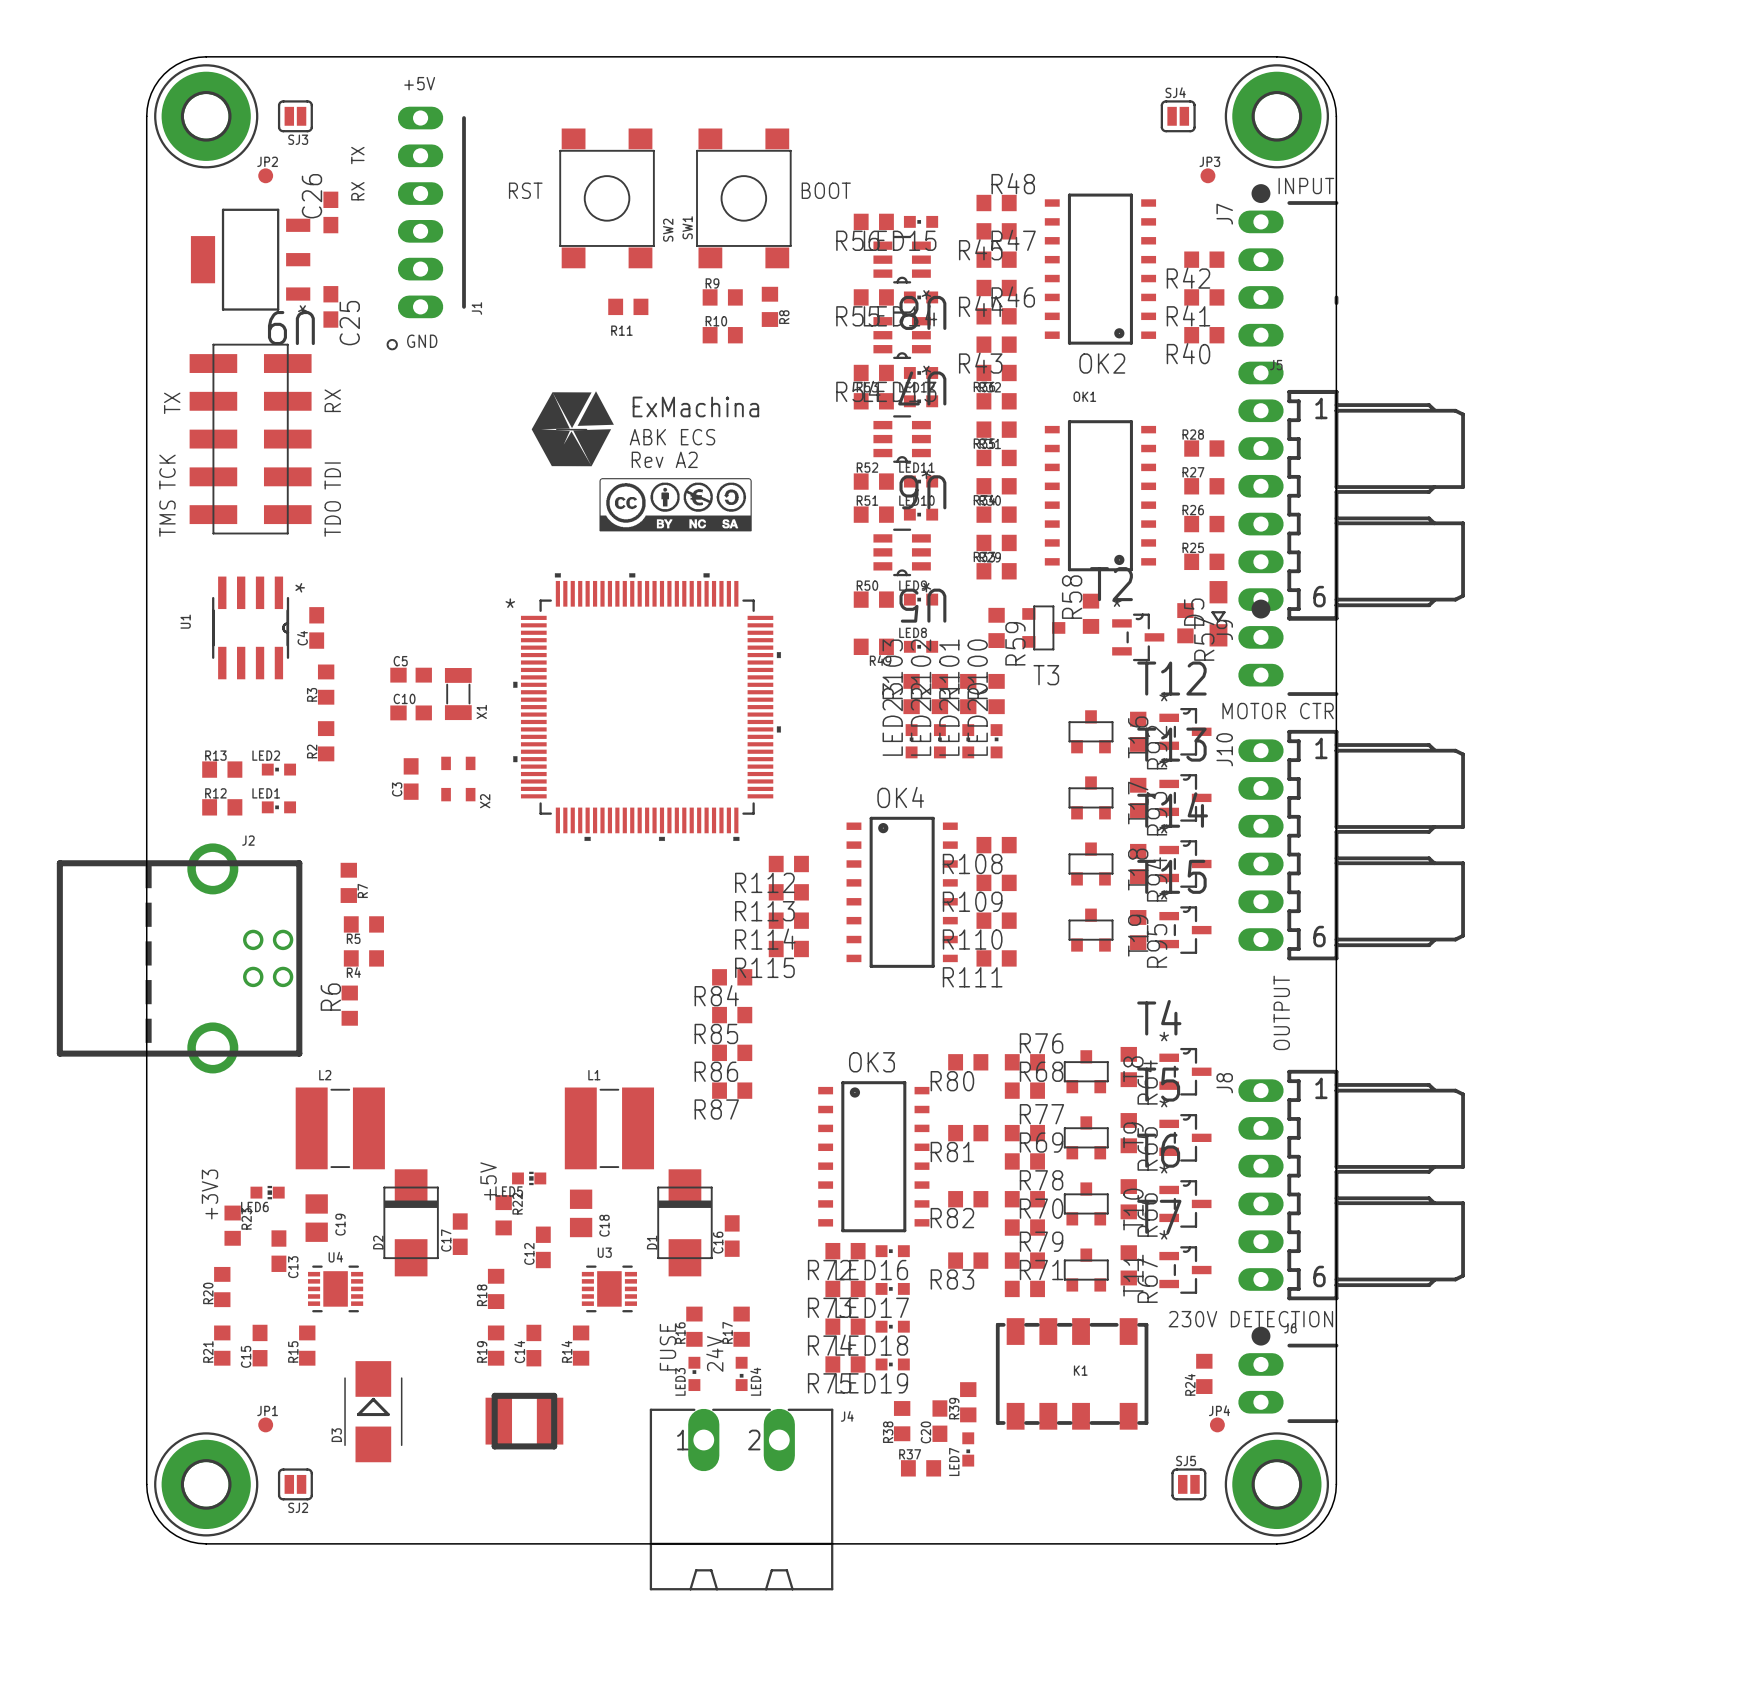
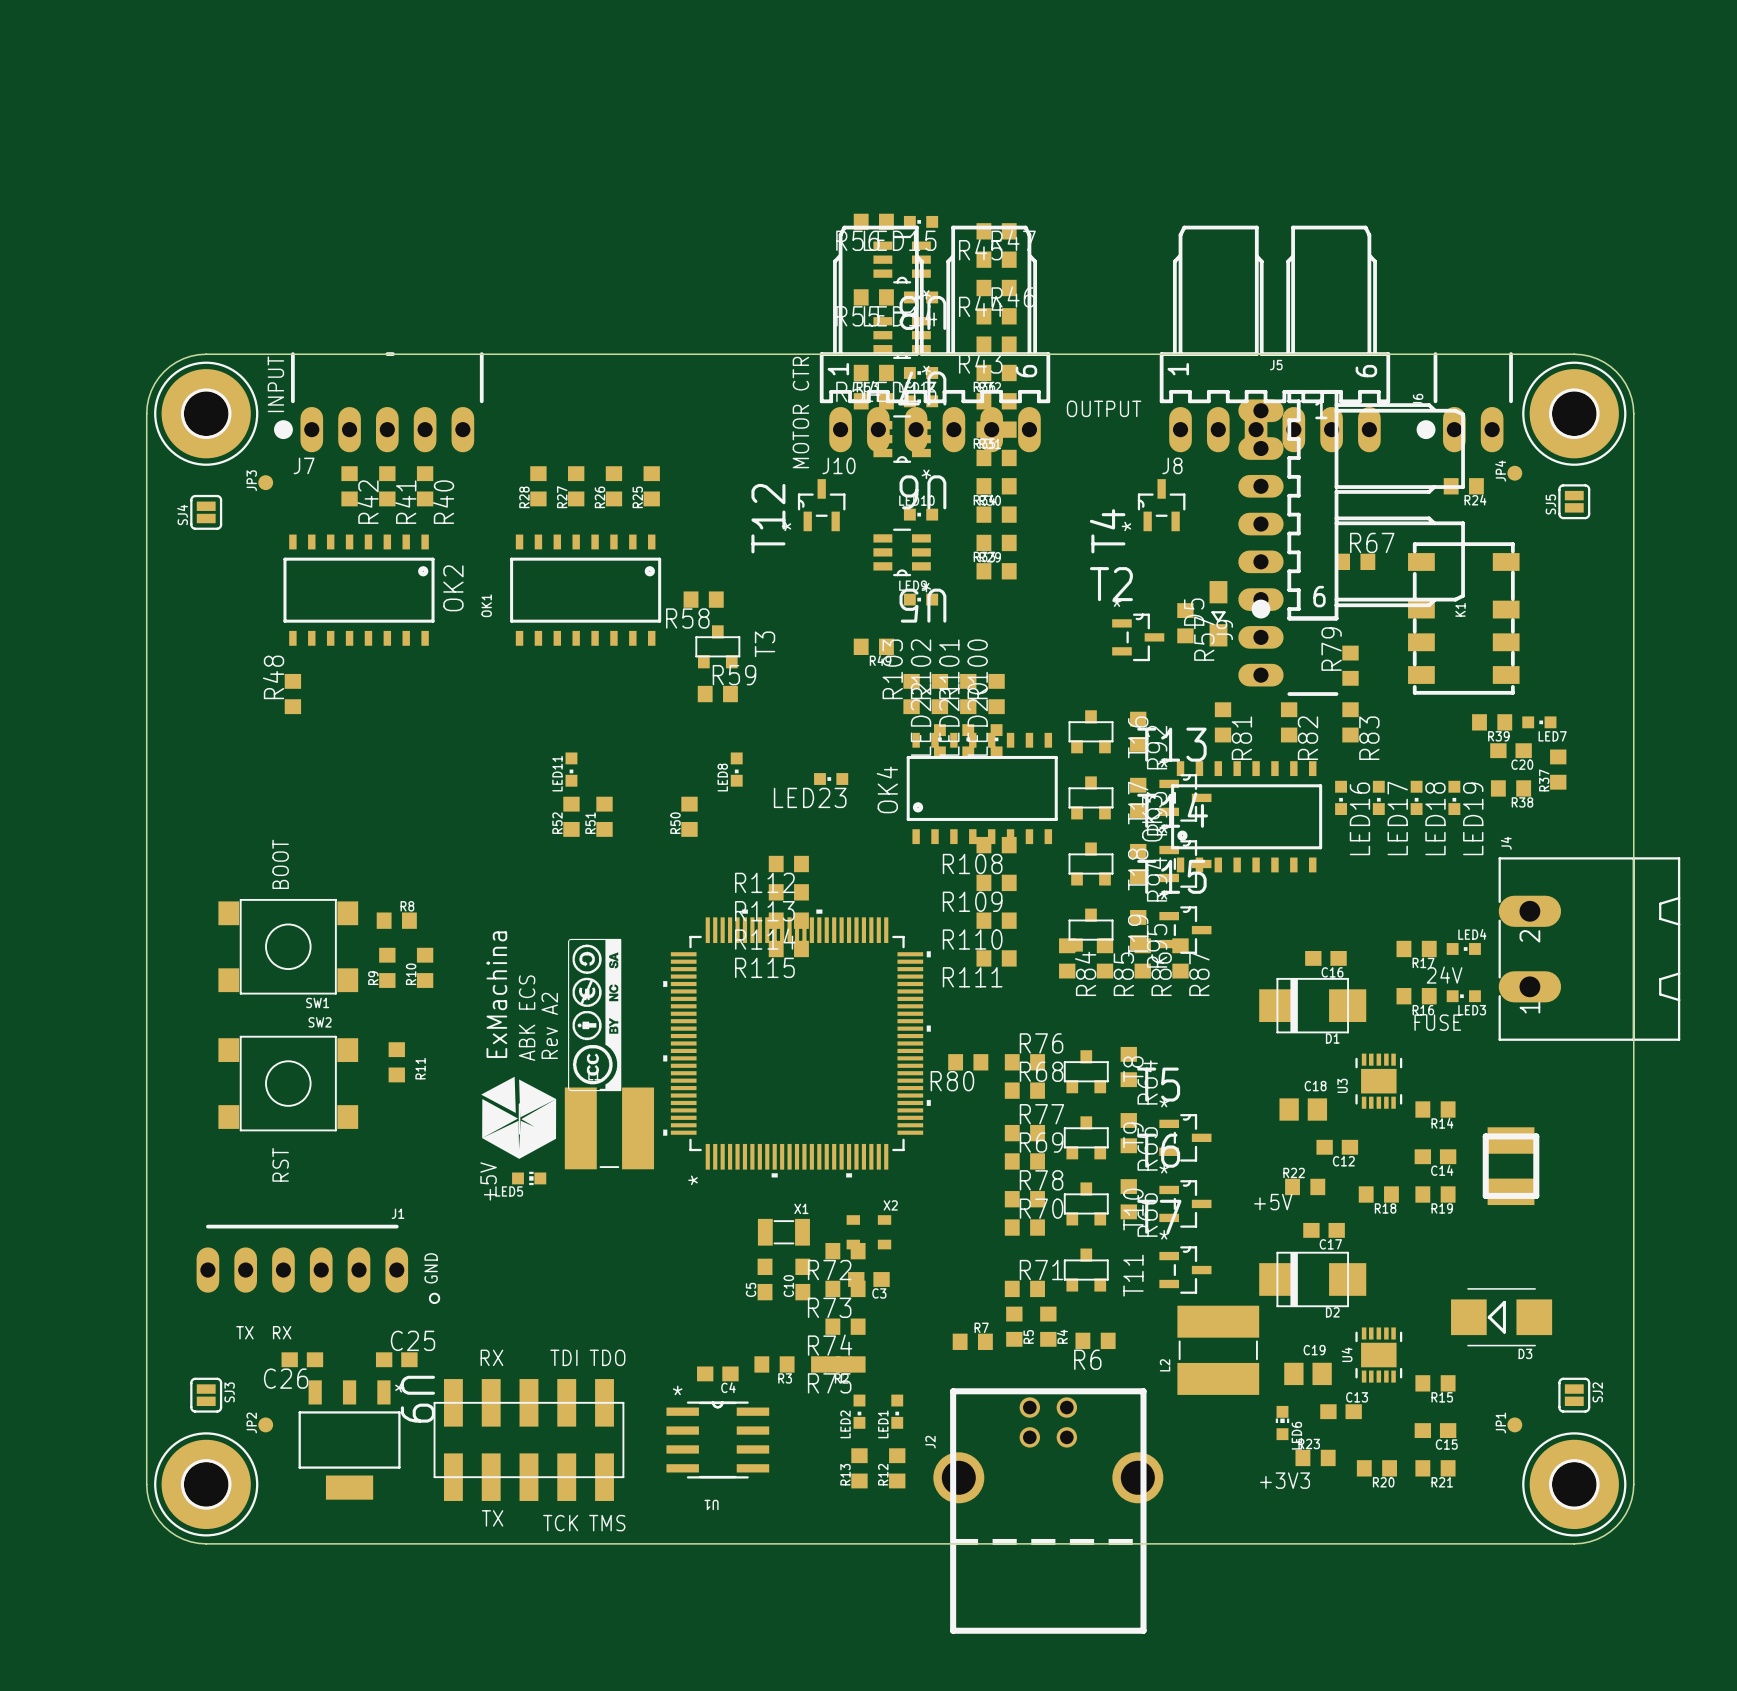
text: +5V (419, 83) -> none
part position: (206, 116) -> (206, 413)
SJ3 rotation: 0° (295, 116) -> 90° counterclockwise (206, 1395)
SJ3 position: (295, 116) -> (206, 1395)
SJ4 rotation: 0° (1178, 116) -> 90° counterclockwise (206, 512)
SJ4 position: (1178, 116) -> (206, 512)
part: (1276, 116) -> none
text: TX (357, 155) -> none
JP3 name rotation: 0° (1209, 161) -> 90° counterclockwise (251, 480)
JP2: (265, 175) -> none
JP3 position: (1207, 175) -> (265, 482)
R48 name position: R48 (1013, 183) -> R48 (273, 677)
text: INPUT (1306, 186) -> none
text: RST (525, 190) -> none
text: BOOT (826, 190) -> none
text: RX (357, 191) -> none
C26 name position: C26 (311, 196) -> C26 (286, 1378)
SW2 rotation: 0° (607, 198) -> 90° clockwise (288, 1083)
SW2 position: (607, 198) -> (288, 1083)
SW1 rotation: 0° (743, 198) -> 90° clockwise (288, 946)
SW1 position: (743, 198) -> (288, 946)
R48 rotation: 0° (996, 203) -> 90° clockwise (292, 694)
R48 position: (996, 203) -> (292, 694)
C26 rotation: 0° (330, 212) -> 90° clockwise (302, 1359)
C26 position: (330, 212) -> (302, 1359)
SW1 name position: SW1 (687, 227) -> SW1 (317, 1002)
J1 rotation: 0° (426, 228) -> 90° counterclockwise (318, 1264)
J1 position: (426, 228) -> (318, 1264)
SW2 name position: SW2 (668, 230) -> SW2 (320, 1022)
U9 rotation: 0° (250, 259) -> 90° counterclockwise (349, 1440)
U9 position: (250, 259) -> (349, 1440)
R42 rotation: 0° (1204, 259) -> 90° clockwise (349, 486)
R42 position: (1204, 259) -> (349, 486)
OK2 rotation: 0° (1100, 269) -> 90° counterclockwise (359, 590)
OK2 position: (1100, 269) -> (359, 590)
R42 name position: R42 (1188, 278) -> R42 (367, 502)
J7 rotation: 0° (1288, 288) -> 90° counterclockwise (378, 402)
J7 position: (1288, 288) -> (378, 402)
R9 rotation: 0° (722, 297) -> 90° clockwise (387, 967)
R9 position: (722, 297) -> (387, 967)
R41 rotation: 0° (1204, 297) -> 90° clockwise (387, 486)
R41 position: (1204, 297) -> (387, 486)
C25 rotation: 0° (330, 306) -> 90° clockwise (396, 1359)
C25 position: (330, 306) -> (396, 1359)
R11 rotation: 0° (628, 306) -> 90° clockwise (396, 1062)
R11 position: (628, 306) -> (396, 1062)
R8 rotation: 0° (769, 306) -> 90° clockwise (396, 920)
R8 position: (769, 306) -> (396, 920)
R41 name position: R41 (1188, 315) -> R41 (405, 502)
C25 name position: C25 (349, 323) -> C25 (413, 1340)
R11 name position: R11 (621, 330) -> R11 (420, 1068)
R10 rotation: 0° (722, 335) -> 90° clockwise (425, 967)
R10 position: (722, 335) -> (425, 967)
R40 rotation: 0° (1204, 335) -> 90° clockwise (425, 486)
R40 position: (1204, 335) -> (425, 486)
text: GND (422, 341) -> none
R40 name position: R40 (1188, 353) -> R40 (443, 502)
text: none -> INPUT (275, 384)
drawing: [531, 391, 752, 532] -> none
text: RX (332, 400) -> none
text: TX (172, 403) -> none
text: none -> OUTPUT (1104, 408)
text: none -> MOTOR CTR (800, 412)
board edge: (146, 413) (147, 108) (154, 86) (164, 74) (176, 64) (190, 58) (206, 56) (1276, 56) (1299, 61) (1318, 74) (1331, 93) (1336, 116) (1336, 1484) (1331, 1507) (1318, 1526) (1299, 1539) (1276, 1543) -> (146, 413) (151, 390) (164, 371) (183, 358) (206, 354) (1574, 354) (1597, 358) (1616, 371) (1629, 390) (1633, 413) (1633, 1484) (1631, 1499) (1625, 1514) (1616, 1526) (1604, 1535) (1582, 1543) (1276, 1543)
part: none -> (1574, 413)
text: ABK ECS (672, 437) -> none
part: (250, 439) -> none
R28 rotation: 0° (1204, 448) -> 90° clockwise (538, 486)
R28 position: (1204, 448) -> (538, 486)
text: Rev A2 (664, 459) -> none
text: TCK (167, 472) -> none
text: TDI (332, 475) -> none
R52 rotation: 0° (873, 481) -> 90° clockwise (571, 816)
R52 position: (873, 481) -> (571, 816)
LED11 rotation: 0° (921, 481) -> 90° counterclockwise (571, 769)
LED11 position: (921, 481) -> (571, 769)
R27 rotation: 0° (1204, 486) -> 90° clockwise (576, 486)
R27 position: (1204, 486) -> (576, 486)
OK1 rotation: 0° (1100, 495) -> 90° counterclockwise (585, 590)
OK1 position: (1100, 495) -> (585, 590)
R51 rotation: 0° (873, 514) -> 90° clockwise (604, 816)
R51 position: (873, 514) -> (604, 816)
text: TMS (167, 518) -> none
text: TDO (332, 518) -> none
R26 rotation: 0° (1204, 524) -> 90° clockwise (613, 486)
R26 position: (1204, 524) -> (613, 486)
R25 rotation: 0° (1204, 561) -> 90° clockwise (651, 486)
R25 position: (1204, 561) -> (651, 486)
R58 name position: R58 (1072, 597) -> R58 (687, 618)
R50 rotation: 0° (873, 599) -> 90° clockwise (689, 816)
R50 position: (873, 599) -> (689, 816)
R58 rotation: 0° (1091, 613) -> 90° clockwise (703, 599)
R58 position: (1091, 613) -> (703, 599)
U1 rotation: 0° (250, 627) -> 90° counterclockwise (717, 1440)
U1 position: (250, 627) -> (717, 1440)
C4 rotation: 0° (316, 627) -> 90° clockwise (717, 1373)
C4 position: (316, 627) -> (717, 1373)
R59 rotation: 0° (996, 627) -> 90° clockwise (717, 694)
R59 position: (996, 627) -> (717, 694)
T3 rotation: 0° (1043, 627) -> 90° counterclockwise (717, 646)
T3 position: (1043, 627) -> (717, 646)
R59 name position: R59 (1015, 643) -> R59 (734, 675)
LED8 rotation: 0° (921, 646) -> 90° counterclockwise (736, 769)
LED8 position: (921, 646) -> (736, 769)
C5 rotation: 0° (411, 675) -> 90° clockwise (765, 1279)
C5 position: (411, 675) -> (765, 1279)
R3 rotation: 0° (326, 684) -> 90° clockwise (774, 1364)
R3 position: (326, 684) -> (774, 1364)
X1 rotation: 0° (458, 694) -> 90° clockwise (783, 1232)
X1 position: (458, 694) -> (783, 1232)
part rotation: 0° (647, 707) -> 90° counterclockwise (797, 1043)
part position: (647, 707) -> (797, 1043)
X1 name position: X1 (481, 711) -> X1 (801, 1208)
text: MOTOR CTR (1278, 711) -> none
C10 rotation: 0° (411, 712) -> 90° clockwise (802, 1279)
C10 position: (411, 712) -> (802, 1279)
T12 rotation: 0° (1185, 731) -> 90° counterclockwise (821, 505)
T12 position: (1185, 731) -> (821, 505)
R2 rotation: 0° (326, 741) -> 90° clockwise (831, 1364)
R2 position: (326, 741) -> (831, 1364)
LED23 rotation: 0° (911, 741) -> 90° counterclockwise (831, 779)
LED23 position: (911, 741) -> (831, 779)
R13 rotation: 0° (222, 769) -> 90° clockwise (859, 1468)
R13 position: (222, 769) -> (859, 1468)
LED2 rotation: 0° (278, 769) -> 90° counterclockwise (859, 1411)
LED2 position: (278, 769) -> (859, 1411)
C3 rotation: 0° (411, 779) -> 90° clockwise (868, 1279)
C3 position: (411, 779) -> (868, 1279)
X2 rotation: 0° (458, 779) -> 90° clockwise (868, 1232)
X2 position: (458, 779) -> (868, 1232)
X2 name position: X2 (485, 801) -> X2 (890, 1205)
R12 rotation: 0° (222, 807) -> 90° clockwise (897, 1468)
R12 position: (222, 807) -> (897, 1468)
LED1 rotation: 0° (278, 807) -> 90° counterclockwise (897, 1411)
LED1 position: (278, 807) -> (897, 1411)
J10 rotation: 0° (1351, 845) -> 90° counterclockwise (935, 338)
J10 position: (1351, 845) -> (935, 338)
text: none -> BOOT (280, 864)
R7 rotation: 0° (348, 882) -> 90° clockwise (972, 1341)
R7 position: (348, 882) -> (972, 1341)
OK4 rotation: 0° (902, 892) -> 90° counterclockwise (982, 788)
OK4 position: (902, 892) -> (982, 788)
R5 rotation: 0° (363, 924) -> 90° clockwise (1014, 1326)
R5 position: (363, 924) -> (1014, 1326)
drawing: none -> [481, 938, 622, 1159]
J2 rotation: 0° (179, 958) -> 90° counterclockwise (1048, 1511)
J2 position: (179, 958) -> (1048, 1511)
R4 rotation: 0° (363, 958) -> 90° clockwise (1048, 1326)
R4 position: (363, 958) -> (1048, 1326)
text: none -> 24V (1444, 975)
R84 rotation: 0° (732, 977) -> 90° clockwise (1067, 958)
R84 position: (732, 977) -> (1067, 958)
R84 name position: R84 (716, 995) -> R84 (1085, 973)
R6 name position: R6 (330, 997) -> R6 (1087, 1359)
R6 rotation: 0° (349, 1005) -> 90° clockwise (1095, 1340)
R6 position: (349, 1005) -> (1095, 1340)
text: OUTPUT (1281, 1012) -> none
R85 rotation: 0° (732, 1015) -> 90° clockwise (1104, 958)
R85 position: (732, 1015) -> (1104, 958)
text: none -> ABK ECS (527, 1018)
text: none -> FUSE (1437, 1022)
text: none -> Rev A2 (549, 1025)
R85 name position: R85 (716, 1033) -> R85 (1123, 974)
R86 rotation: 0° (732, 1052) -> 90° clockwise (1142, 958)
R86 position: (732, 1052) -> (1142, 958)
R86 name position: R86 (716, 1071) -> R86 (1161, 974)
T4 rotation: 0° (1185, 1071) -> 90° counterclockwise (1161, 505)
T4 position: (1185, 1071) -> (1161, 505)
L2 name position: L2 (325, 1075) -> L2 (1165, 1365)
R87 rotation: 0° (732, 1090) -> 90° clockwise (1180, 958)
R87 position: (732, 1090) -> (1180, 958)
R87 name position: R87 (716, 1109) -> R87 (1199, 973)
L2 rotation: 0° (340, 1128) -> 90° clockwise (1218, 1350)
L2 position: (340, 1128) -> (1218, 1350)
R81 rotation: 0° (968, 1133) -> 90° clockwise (1223, 722)
R81 position: (968, 1133) -> (1223, 722)
R81 name position: R81 (952, 1152) -> R81 (1241, 738)
OK3 rotation: 0° (873, 1156) -> 90° counterclockwise (1246, 816)
OK3 position: (873, 1156) -> (1246, 816)
text: none -> RST (280, 1164)
part: none -> (1511, 1166)
J8 rotation: 0° (1351, 1185) -> 90° counterclockwise (1274, 338)
J8 position: (1351, 1185) -> (1274, 338)
LED6 rotation: 0° (267, 1192) -> 90° counterclockwise (1282, 1423)
LED6 position: (267, 1192) -> (1282, 1423)
text: +3V3 (209, 1194) -> none
R82 rotation: 0° (968, 1199) -> 90° clockwise (1289, 722)
R82 position: (968, 1199) -> (1289, 722)
text: none -> +5V (1273, 1202)
C18 rotation: 0° (581, 1213) -> 90° clockwise (1303, 1109)
C18 position: (581, 1213) -> (1303, 1109)
R22 rotation: 0° (503, 1215) -> 90° clockwise (1305, 1186)
R22 position: (503, 1215) -> (1305, 1186)
C19 rotation: 0° (316, 1218) -> 90° clockwise (1308, 1373)
C19 position: (316, 1218) -> (1308, 1373)
R82 name position: R82 (952, 1218) -> R82 (1308, 738)
D2 rotation: 0° (411, 1222) -> 90° counterclockwise (1312, 1279)
D2 position: (411, 1222) -> (1312, 1279)
D1 rotation: 0° (684, 1222) -> 90° counterclockwise (1312, 1005)
D1 position: (684, 1222) -> (1312, 1005)
C19 name position: C19 (340, 1224) -> C19 (1314, 1350)
R23 rotation: 0° (232, 1225) -> 90° clockwise (1315, 1457)
R23 position: (232, 1225) -> (1315, 1457)
C18 name position: C18 (604, 1225) -> C18 (1315, 1086)
C17 rotation: 0° (460, 1234) -> 90° clockwise (1324, 1230)
C17 position: (460, 1234) -> (1324, 1230)
C16 rotation: 0° (732, 1236) -> 90° clockwise (1325, 958)
C16 position: (732, 1236) -> (1325, 958)
R79 name position: R79 (1041, 1241) -> R79 (1331, 649)
C12 rotation: 0° (543, 1247) -> 90° clockwise (1337, 1147)
C12 position: (543, 1247) -> (1337, 1147)
C13 rotation: 0° (278, 1251) -> 90° clockwise (1341, 1411)
C13 position: (278, 1251) -> (1341, 1411)
LED16 rotation: 0° (892, 1251) -> 90° counterclockwise (1341, 797)
LED16 position: (892, 1251) -> (1341, 797)
U3 name position: U3 (604, 1252) -> U3 (1342, 1085)
U4 name position: U4 (335, 1257) -> U4 (1347, 1354)
R83 rotation: 0° (968, 1260) -> 90° clockwise (1350, 722)
R83 position: (968, 1260) -> (1350, 722)
R79 rotation: 0° (1024, 1260) -> 90° clockwise (1350, 665)
R79 position: (1024, 1260) -> (1350, 665)
R67 rotation: 0° (1128, 1265) -> 90° clockwise (1355, 561)
R67 position: (1128, 1265) -> (1355, 561)
text: none -> GND (431, 1268)
R83 name position: R83 (952, 1279) -> R83 (1369, 738)
R67 name position: R67 (1147, 1280) -> R67 (1372, 542)
R20 rotation: 0° (222, 1287) -> 90° clockwise (1376, 1468)
R20 position: (222, 1287) -> (1376, 1468)
U4 rotation: 0° (335, 1288) -> 90° clockwise (1378, 1355)
U4 position: (335, 1288) -> (1378, 1355)
R18 rotation: 0° (496, 1288) -> 90° clockwise (1378, 1194)
R18 position: (496, 1288) -> (1378, 1194)
U3 rotation: 0° (609, 1288) -> 90° clockwise (1378, 1081)
U3 position: (609, 1288) -> (1378, 1081)
LED17 rotation: 0° (892, 1288) -> 90° counterclockwise (1378, 797)
LED17 position: (892, 1288) -> (1378, 797)
text: 230V DETECTION (1250, 1319) -> none
R16 rotation: 0° (694, 1326) -> 90° clockwise (1416, 996)
R16 position: (694, 1326) -> (1416, 996)
R17 rotation: 0° (741, 1326) -> 90° clockwise (1416, 948)
R17 position: (741, 1326) -> (1416, 948)
LED18 rotation: 0° (892, 1326) -> 90° counterclockwise (1416, 797)
LED18 position: (892, 1326) -> (1416, 797)
text: none -> TX (244, 1332)
text: none -> RX (282, 1332)
R21 rotation: 0° (222, 1345) -> 90° clockwise (1435, 1468)
R21 position: (222, 1345) -> (1435, 1468)
C15 rotation: 0° (260, 1345) -> 90° clockwise (1435, 1430)
C15 position: (260, 1345) -> (1435, 1430)
R15 rotation: 0° (307, 1345) -> 90° clockwise (1435, 1383)
R15 position: (307, 1345) -> (1435, 1383)
R19 rotation: 0° (496, 1345) -> 90° clockwise (1435, 1194)
R19 position: (496, 1345) -> (1435, 1194)
C14 rotation: 0° (533, 1345) -> 90° clockwise (1435, 1156)
C14 position: (533, 1345) -> (1435, 1156)
R14 rotation: 0° (581, 1345) -> 90° clockwise (1435, 1109)
R14 position: (581, 1345) -> (1435, 1109)
text: FUSE (667, 1347) -> none
text: 24V (714, 1354) -> none
text: none -> RX (491, 1357)
text: none -> TDI (563, 1357)
text: none -> TDO (607, 1357)
LED19 rotation: 0° (892, 1364) -> 90° counterclockwise (1454, 797)
LED19 position: (892, 1364) -> (1454, 797)
LED3 rotation: 0° (694, 1373) -> 90° counterclockwise (1463, 996)
LED3 position: (694, 1373) -> (1463, 996)
LED4 rotation: 0° (741, 1373) -> 90° counterclockwise (1463, 948)
LED4 position: (741, 1373) -> (1463, 948)
K1 rotation: 0° (1072, 1373) -> 90° counterclockwise (1463, 618)
K1 position: (1072, 1373) -> (1463, 618)
R24 rotation: 0° (1204, 1373) -> 90° clockwise (1463, 486)
R24 position: (1204, 1373) -> (1463, 486)
J6 rotation: 0° (1288, 1374) -> 90° counterclockwise (1464, 402)
J6 position: (1288, 1374) -> (1464, 402)
R39 rotation: 0° (968, 1402) -> 90° clockwise (1492, 722)
R39 position: (968, 1402) -> (1492, 722)
JP1 name: JP1 (267, 1410) -> JP2 (251, 1423)
JP4 name rotation: 0° (1219, 1410) -> 90° counterclockwise (1500, 471)
D3 rotation: 0° (373, 1411) -> 90° counterclockwise (1501, 1317)
D3 position: (373, 1411) -> (1501, 1317)
part: (524, 1421) -> none
R38 rotation: 0° (902, 1421) -> 90° clockwise (1511, 788)
R38 position: (902, 1421) -> (1511, 788)
C20 rotation: 0° (939, 1421) -> 90° clockwise (1511, 750)
C20 position: (939, 1421) -> (1511, 750)
JP4 position: (1217, 1424) -> (1514, 473)
JP1: none -> (1514, 1424)
part: none -> (528, 1440)
LED7 rotation: 0° (968, 1449) -> 90° counterclockwise (1539, 722)
LED7 position: (968, 1449) -> (1539, 722)
R37 rotation: 0° (921, 1468) -> 90° clockwise (1558, 769)
R37 position: (921, 1468) -> (1558, 769)
text: none -> +3V3 (1285, 1480)
SJ2 rotation: 0° (295, 1484) -> 90° counterclockwise (1574, 1395)
SJ2 position: (295, 1484) -> (1574, 1395)
SJ5 rotation: 0° (1188, 1484) -> 90° counterclockwise (1574, 501)
SJ5 position: (1188, 1484) -> (1574, 501)
part position: (1276, 1484) -> (1574, 1484)
J4 rotation: 0° (741, 1499) -> 90° counterclockwise (1589, 949)
J4 position: (741, 1499) -> (1589, 949)
text: none -> TX (492, 1518)
text: none -> TCK (560, 1523)
text: none -> TMS (607, 1523)

